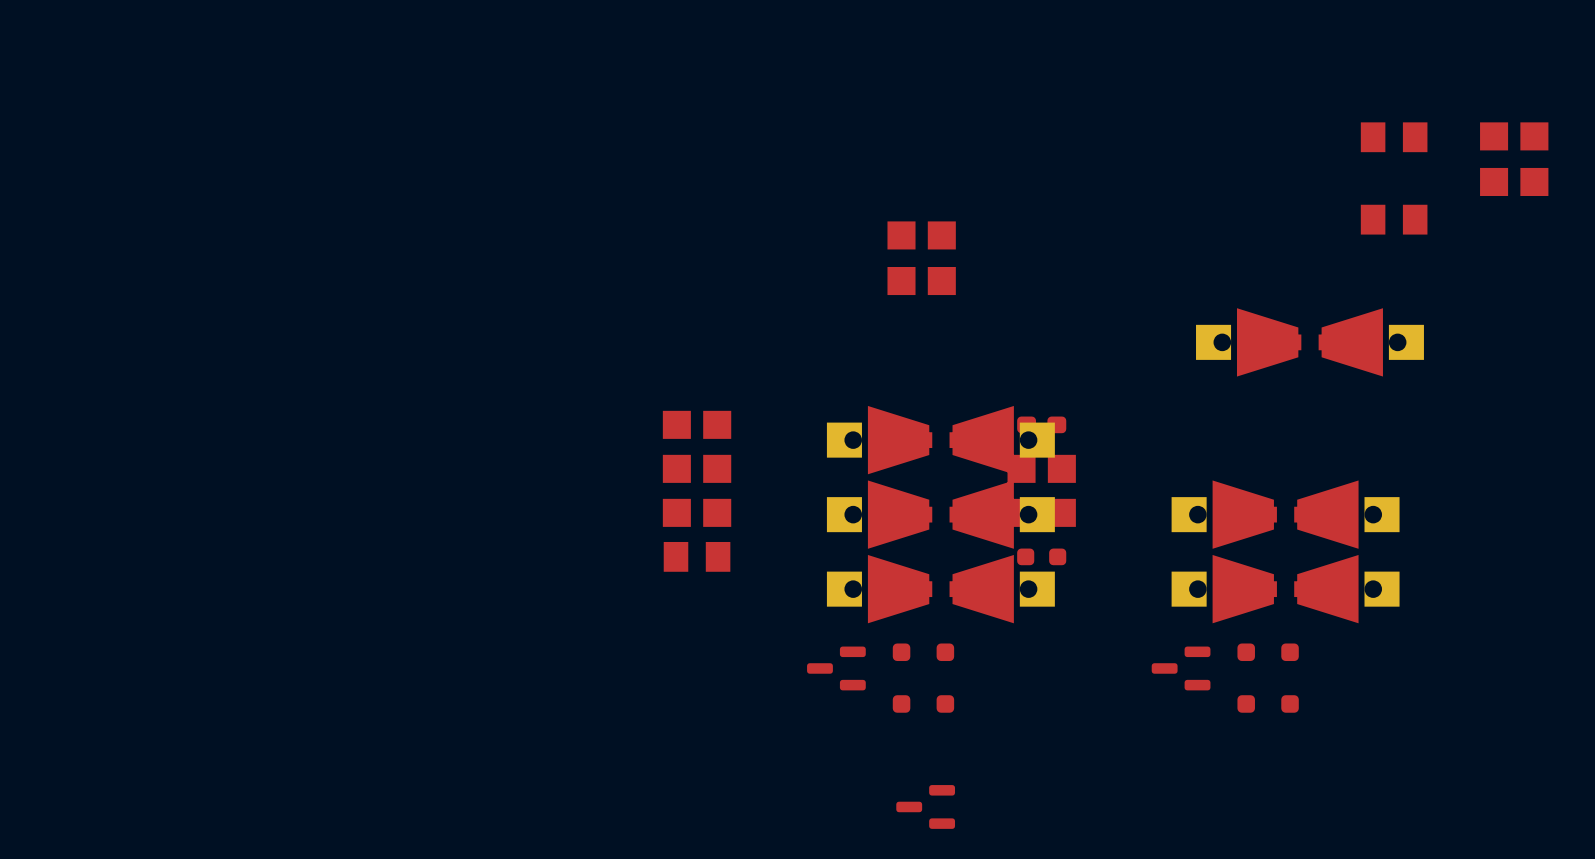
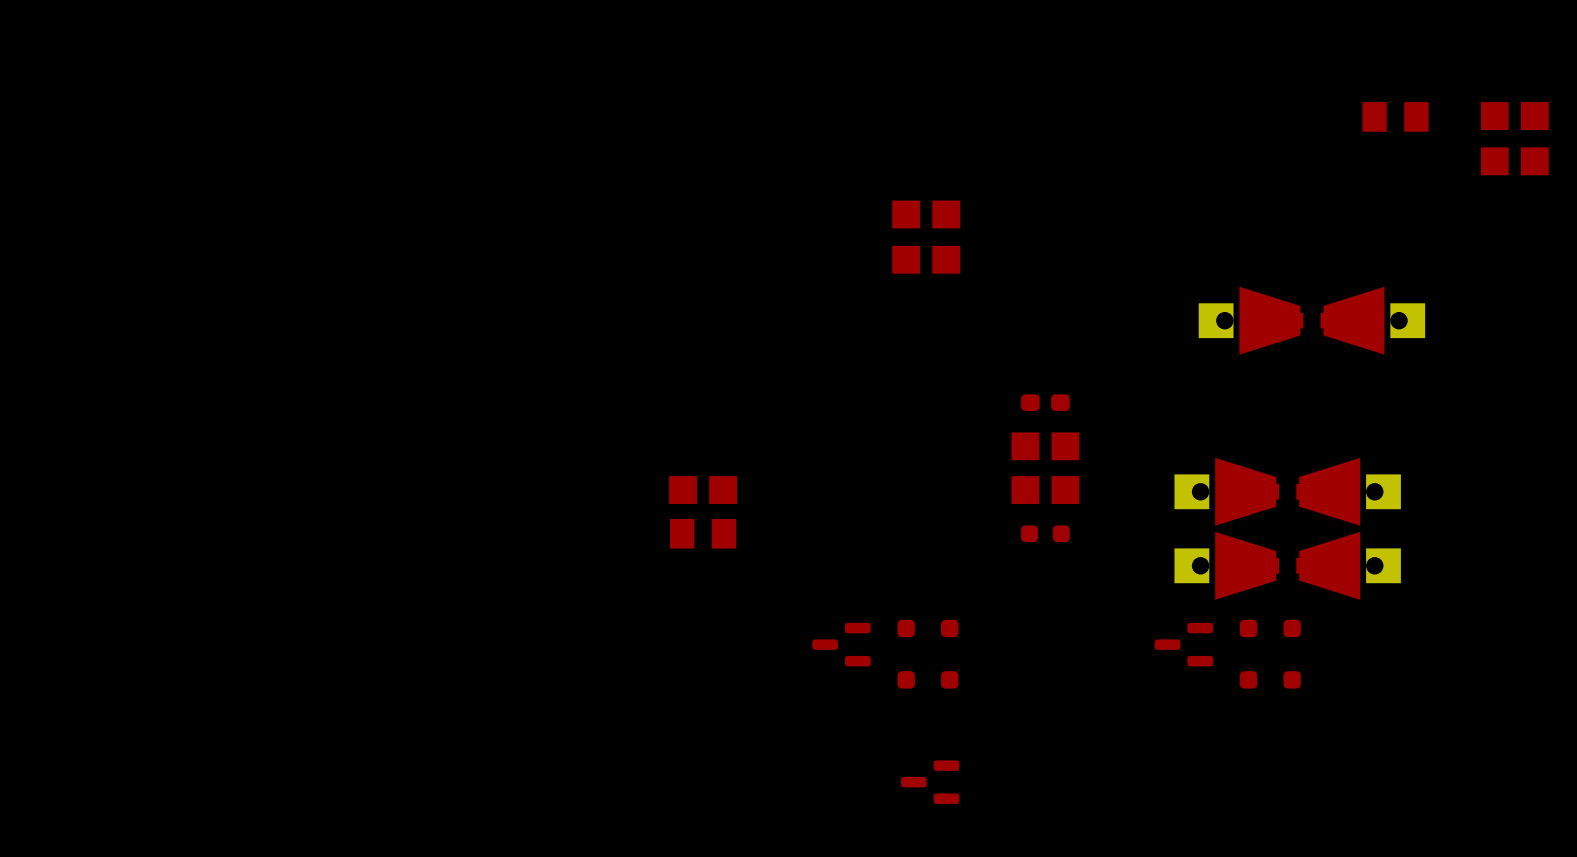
part: (1394, 219) -> none
part: (697, 424) -> none
part: (940, 440) -> none
part: (697, 468) -> none
part: (940, 514) -> none
part: (940, 589) -> none

